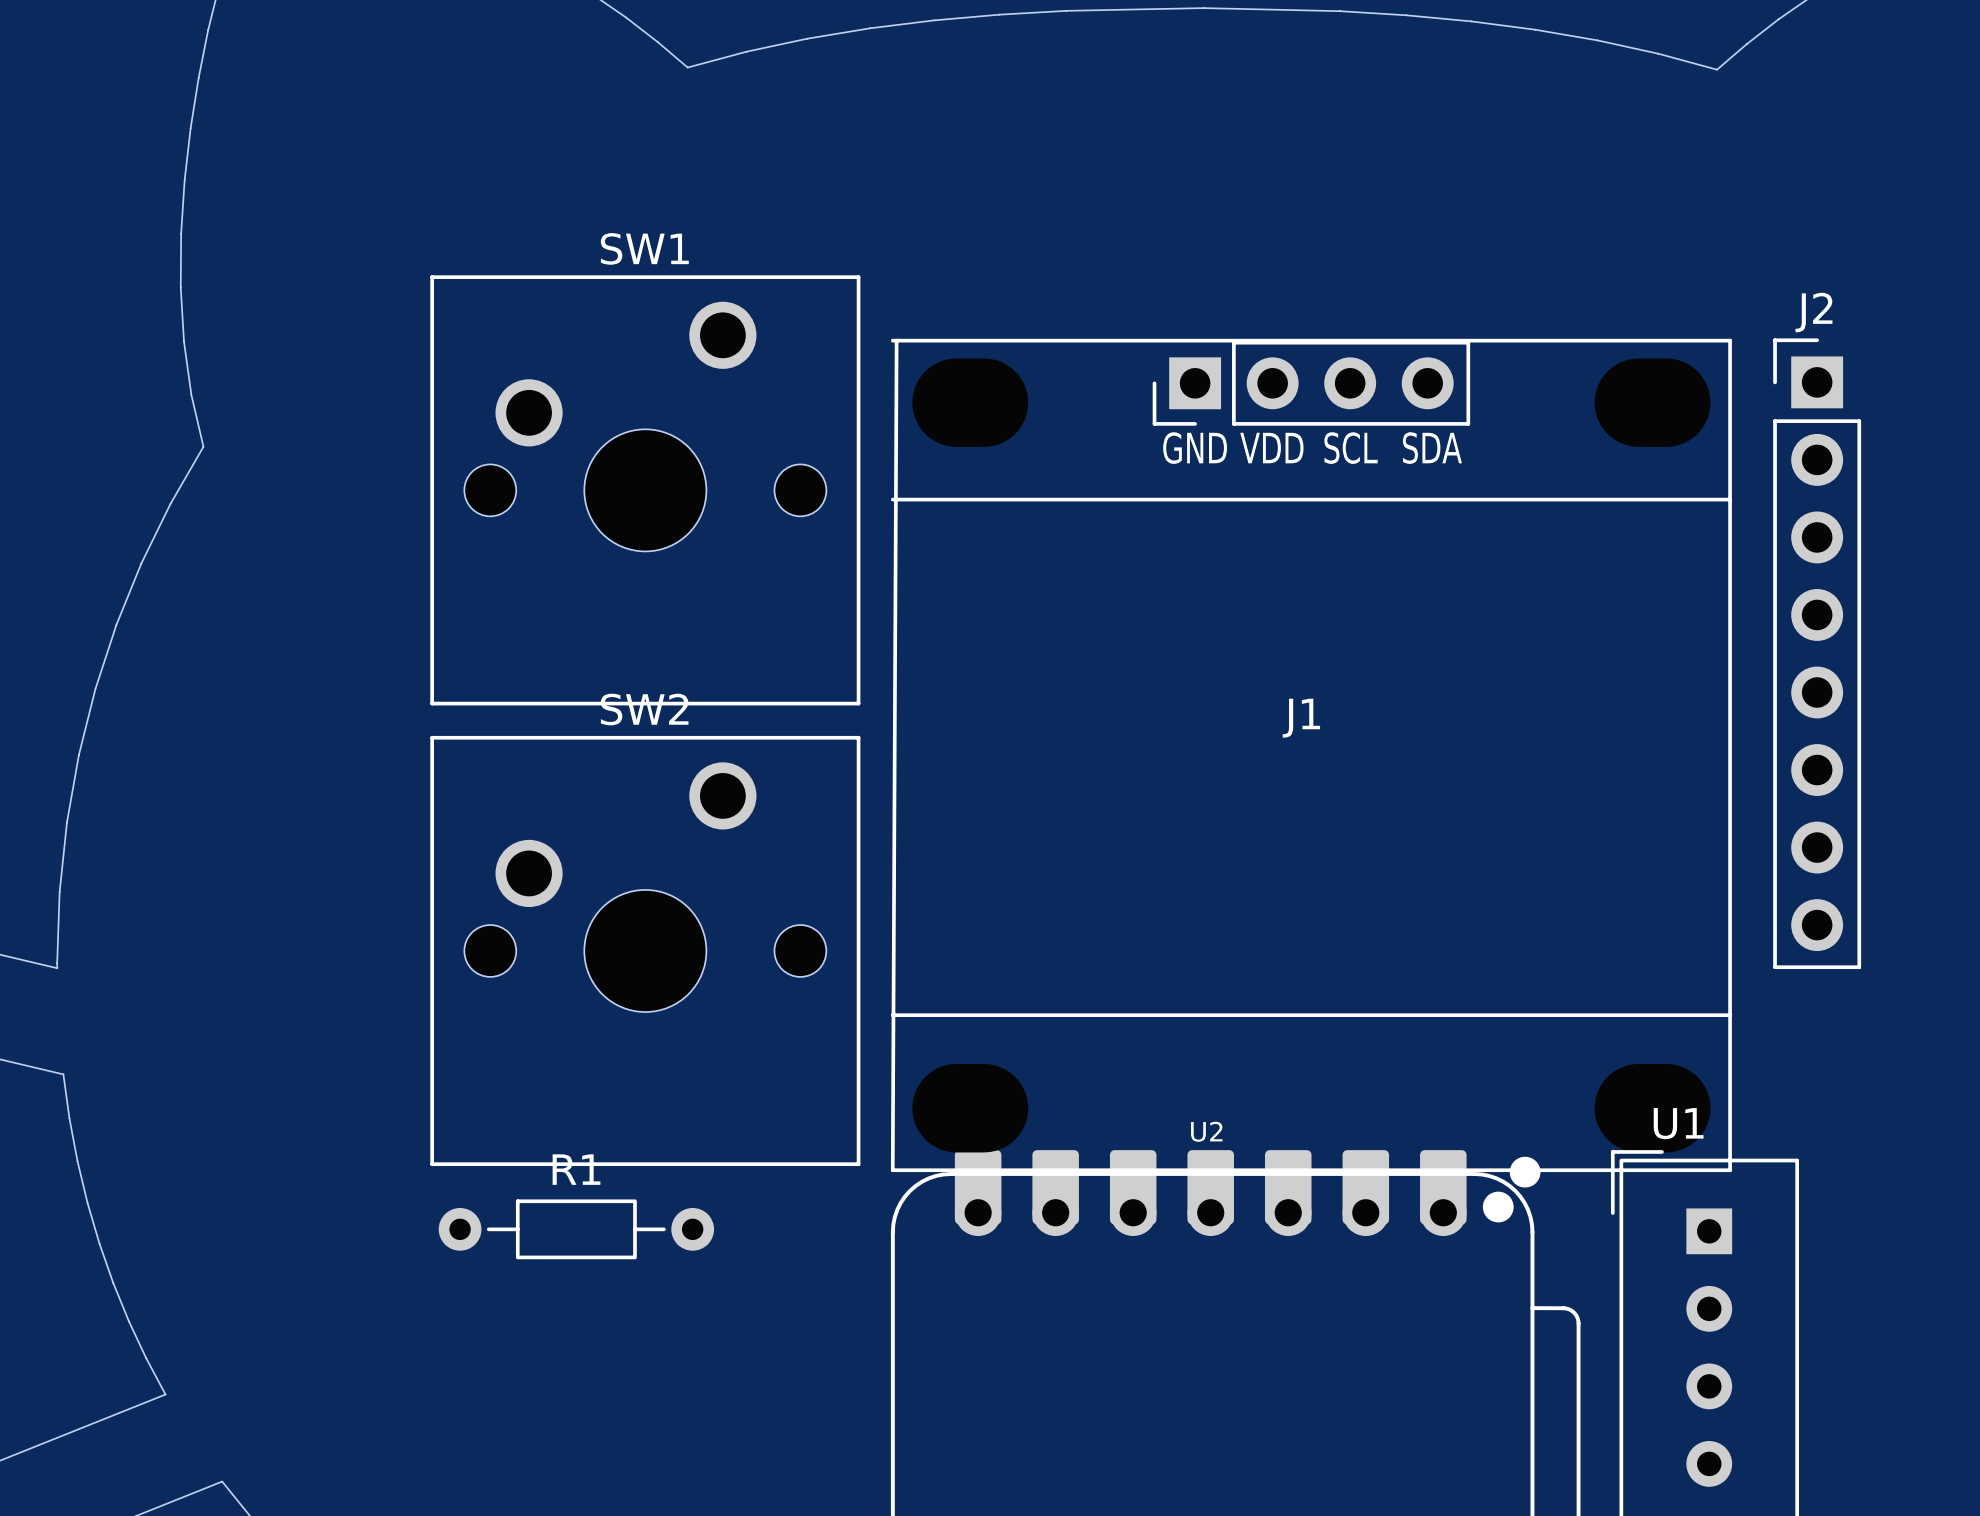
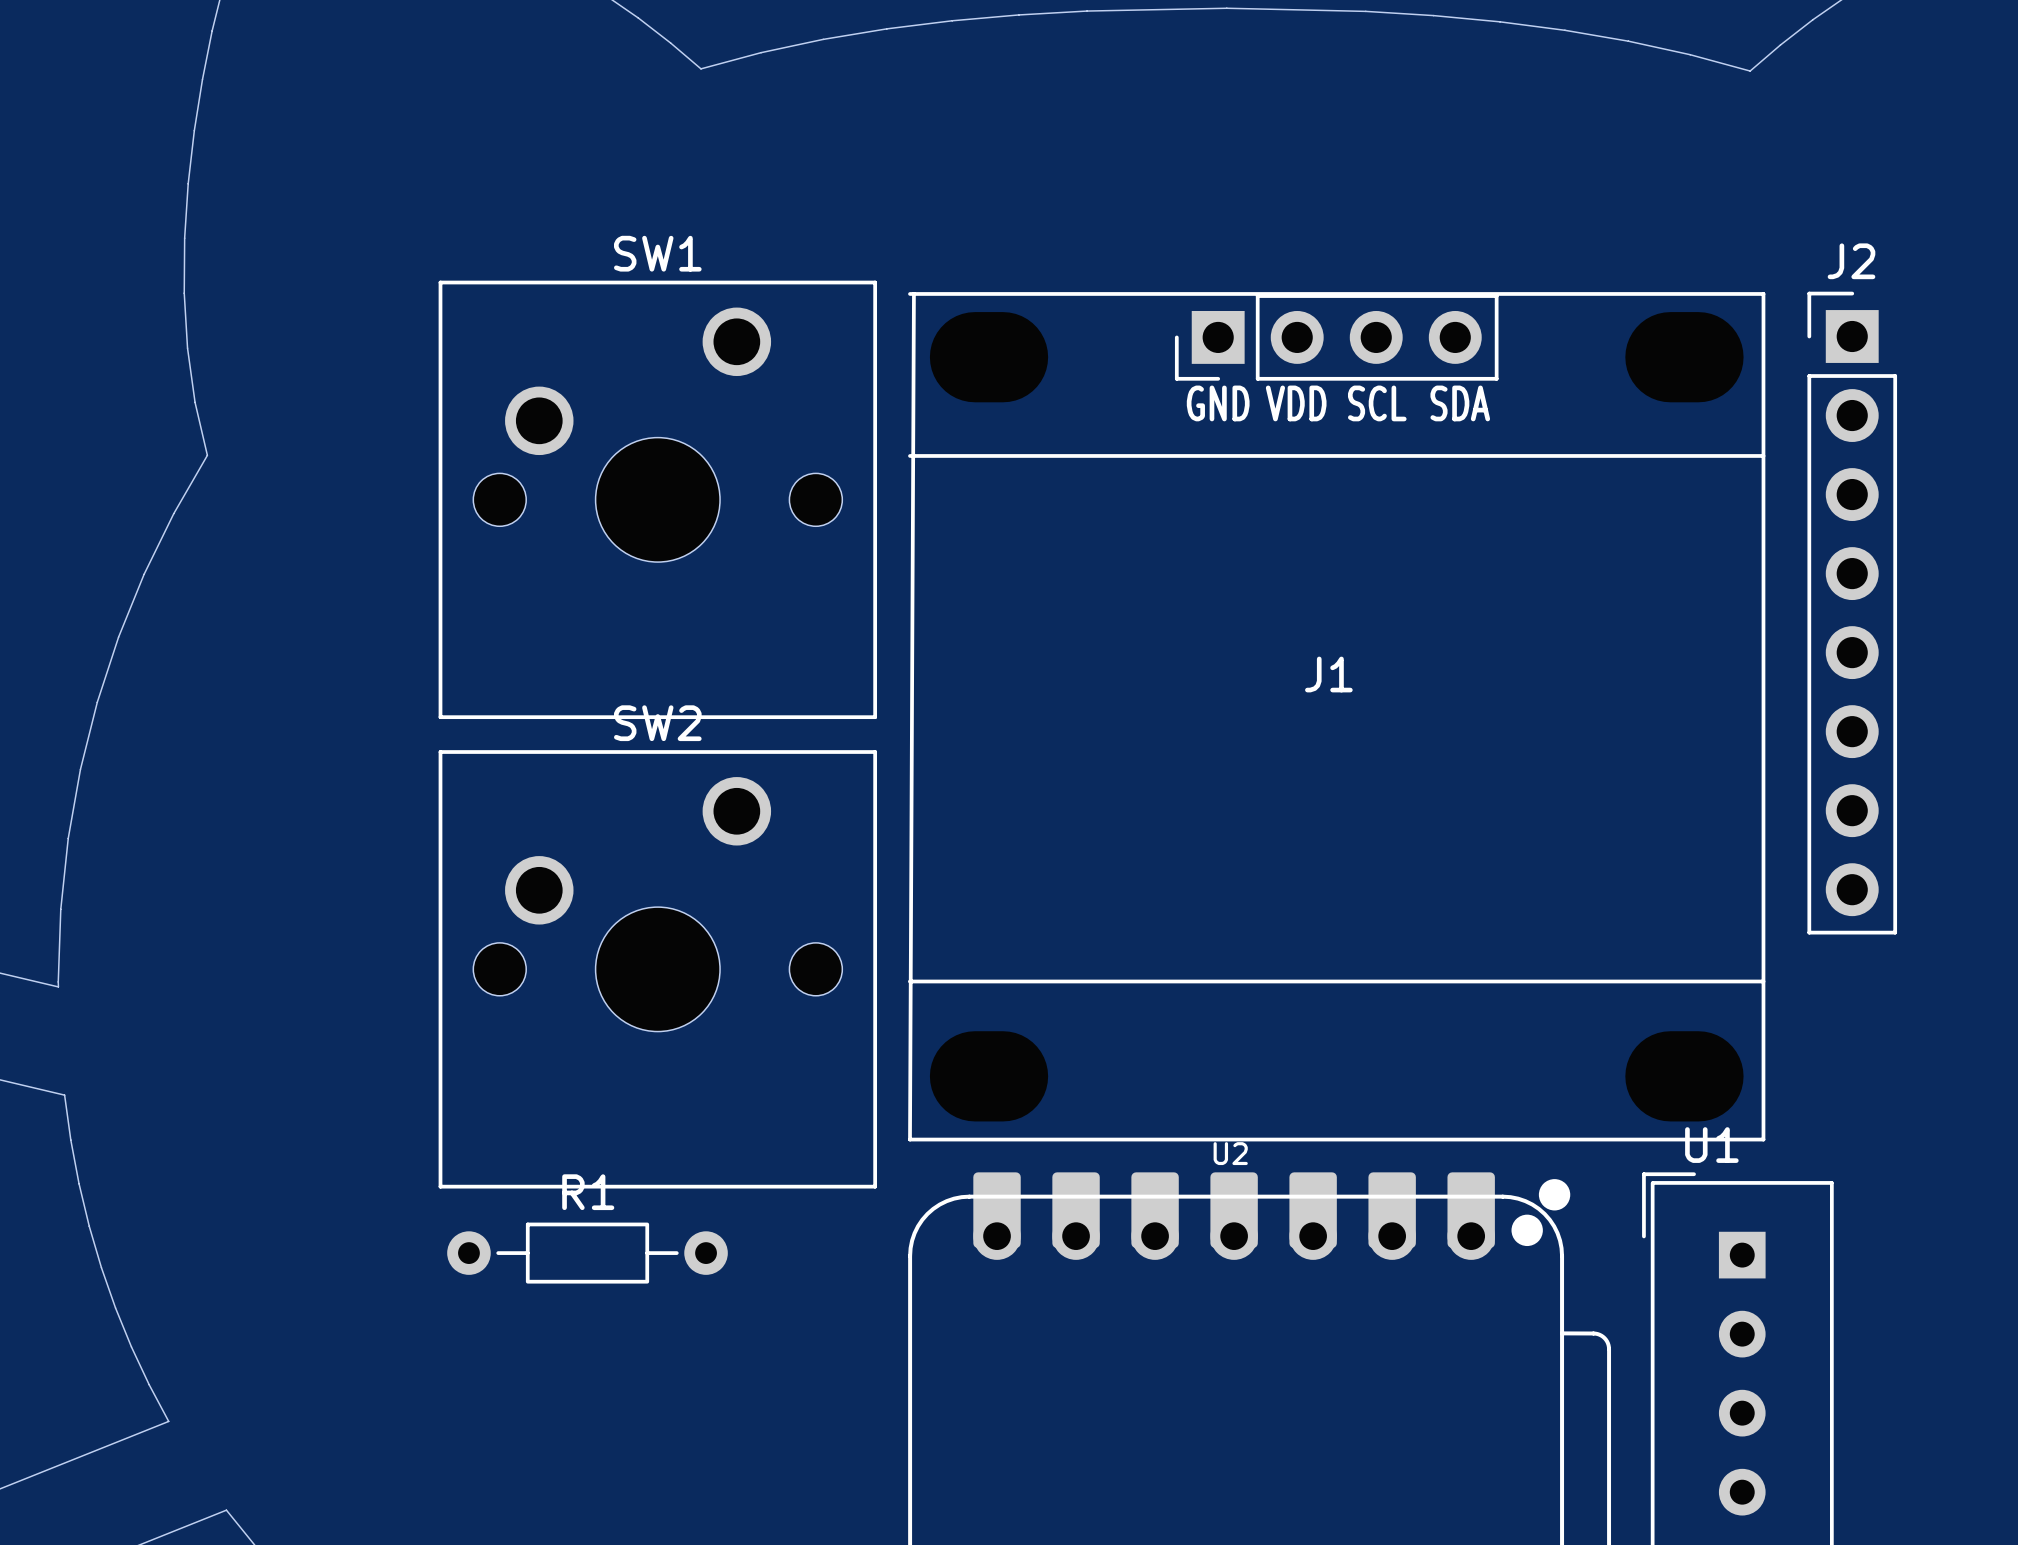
J2 position: (1817, 653) -> (1852, 613)
J1 position: (1311, 755) -> (1336, 716)

